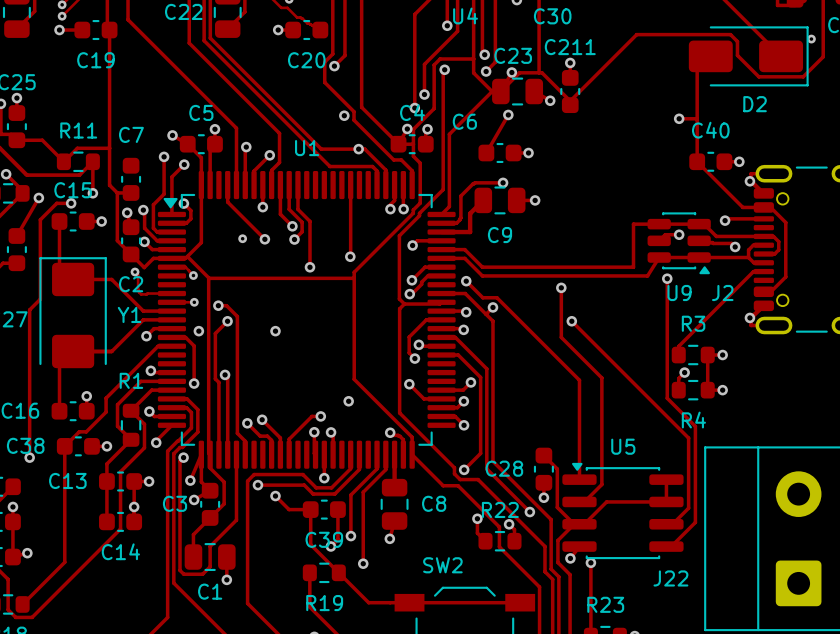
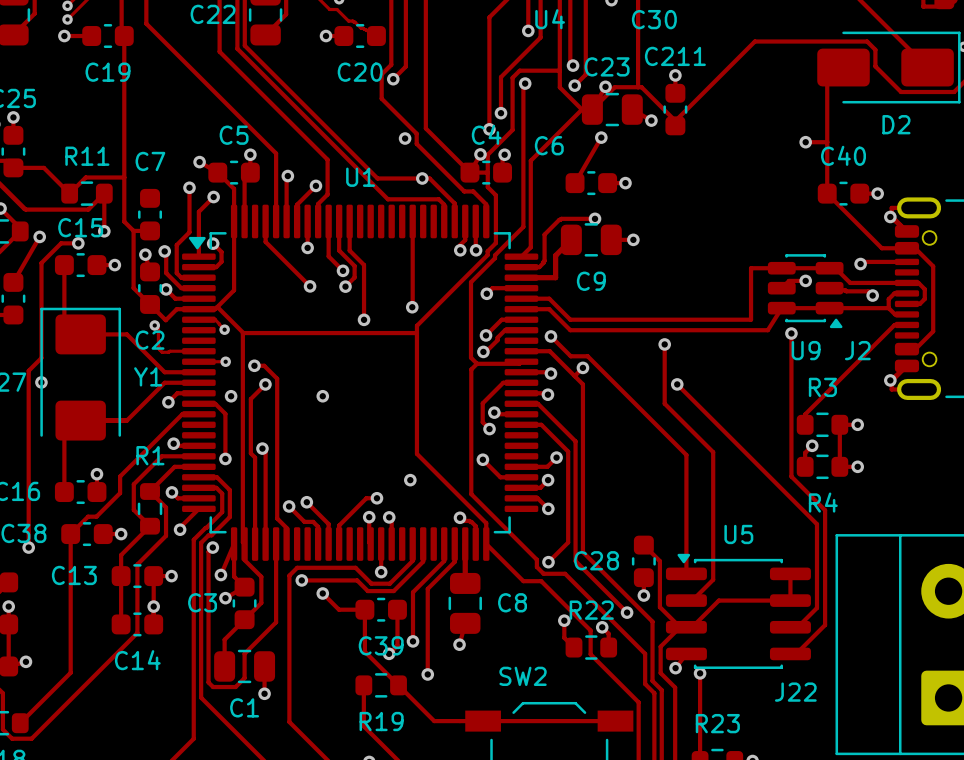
via: (242, 238) -> none
via: none -> (41, 382)

